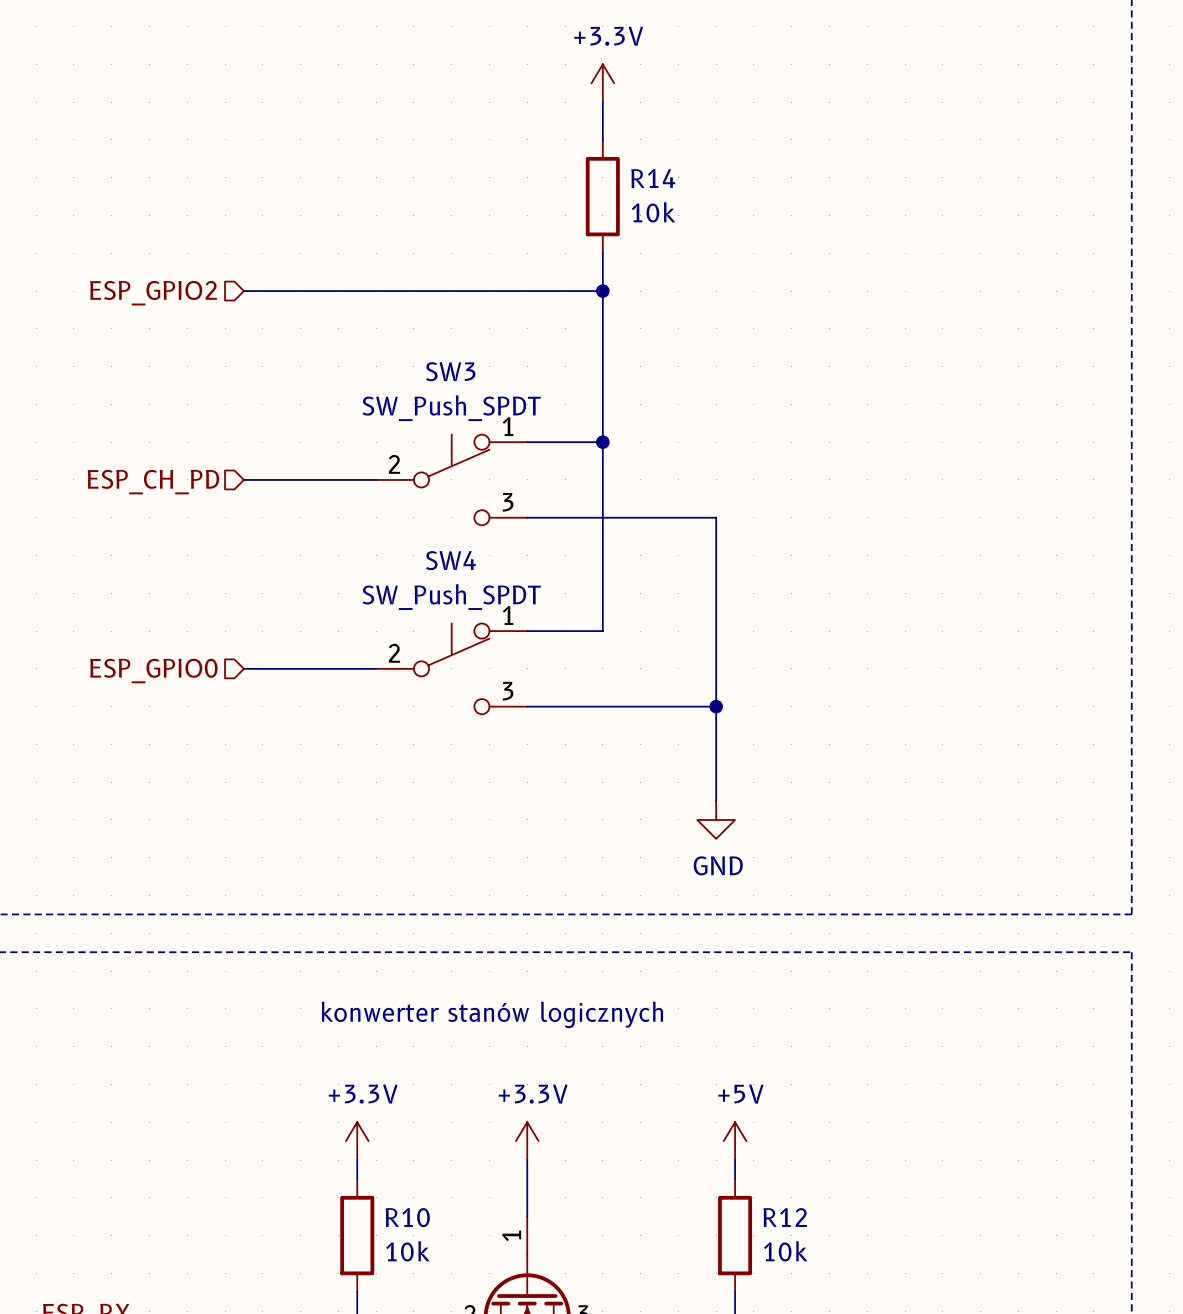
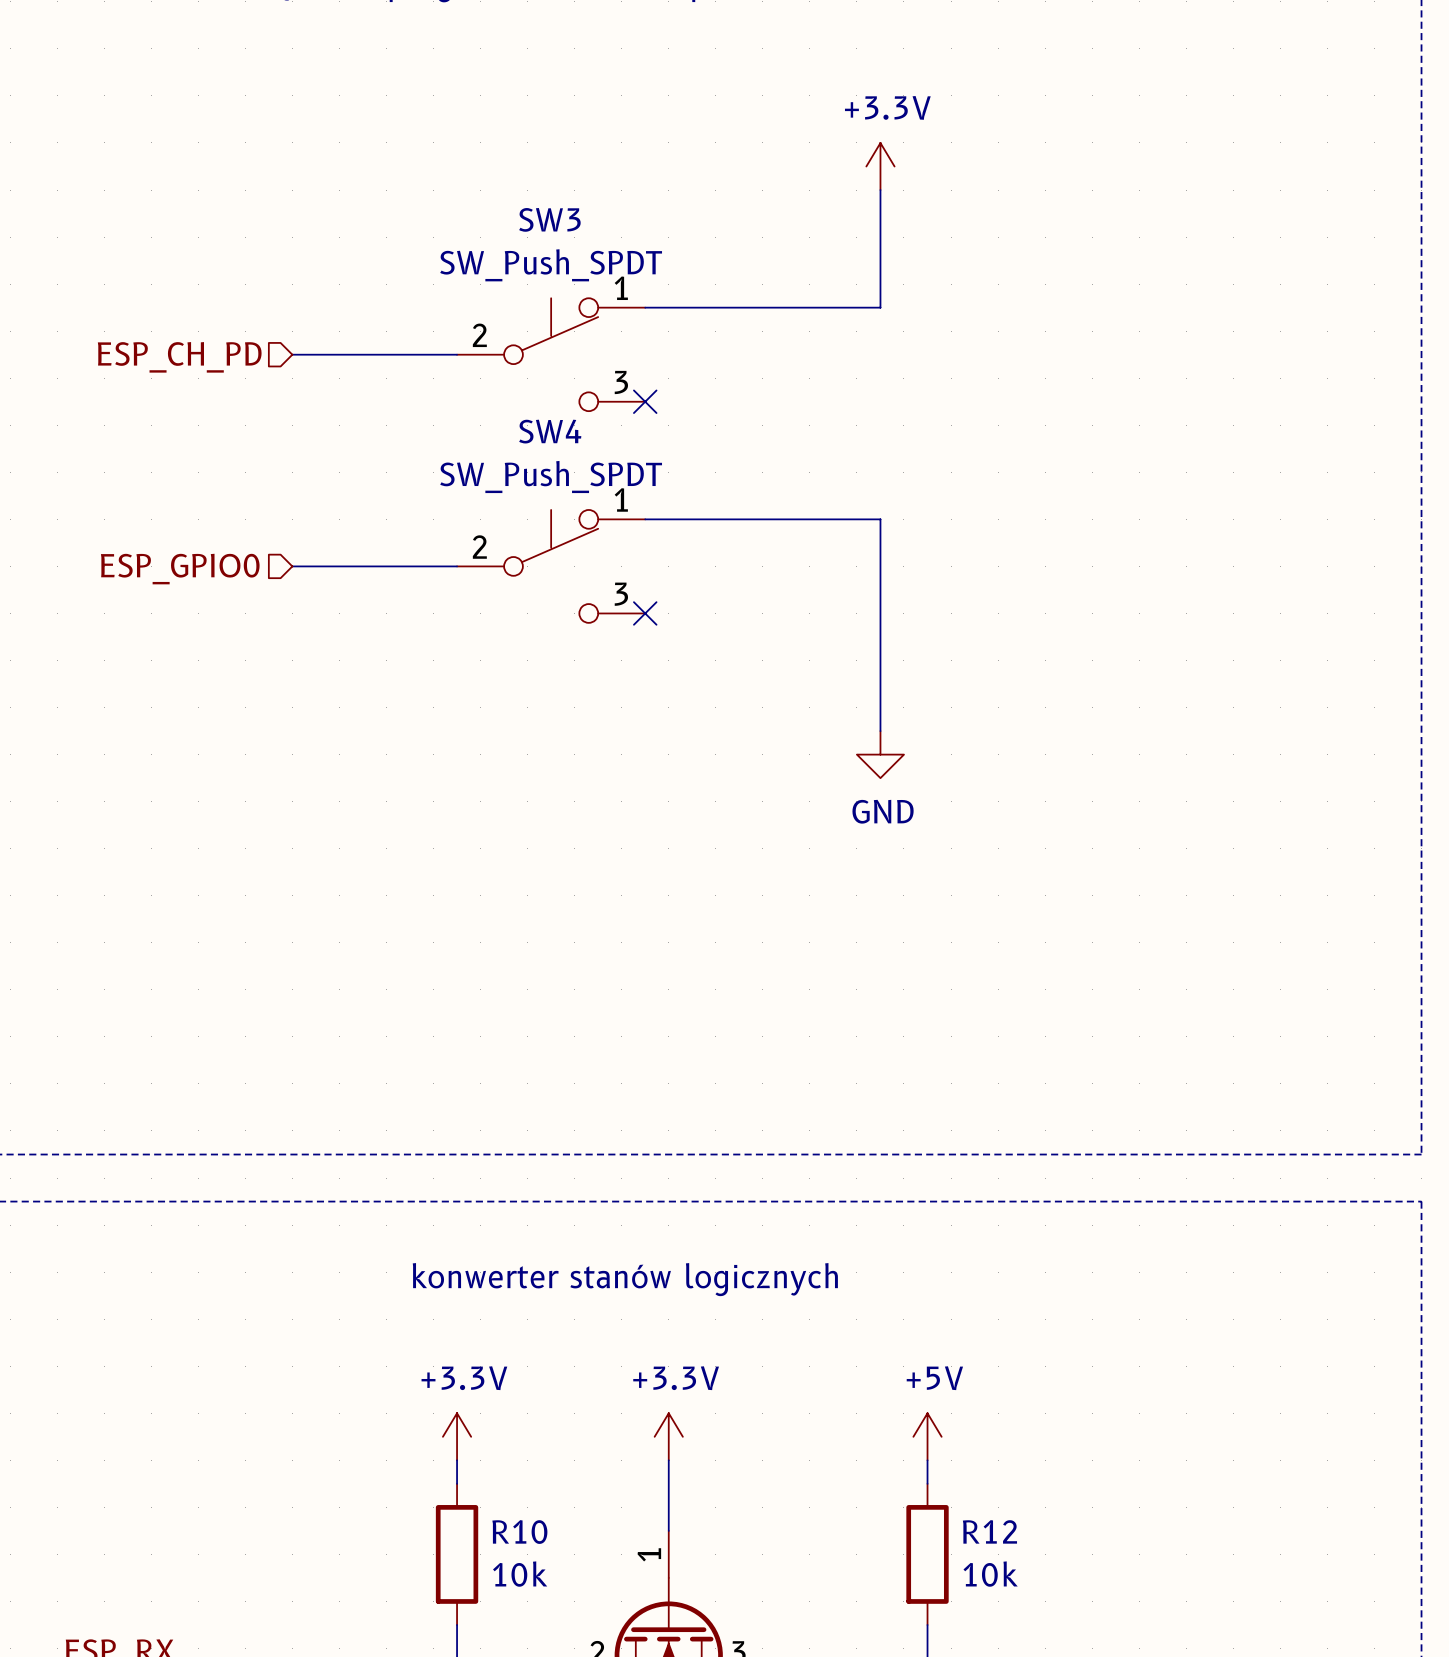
power symbol position: +3.3V (602, 83) -> +3.3V (880, 166)
wire: (602, 102) (602, 139) -> none
wire: none -> (880, 190) (880, 307) (645, 307)
R14: 10k (602, 196) -> none
wire: (602, 253) (602, 631) (527, 631) -> none
wire: none -> (292, 354) (457, 354)
wire: (243, 291) (602, 291) -> none
junction: (602, 291) -> none
hierarchical label: ESP_GPIO2 (153, 293) -> none
no-connect mark: none -> (645, 401)
wire: none -> (645, 519) (880, 519) (880, 731)
wire: (527, 442) (602, 442) -> none
junction: (602, 442) -> none
wire: (243, 479) (376, 479) -> (292, 566) (457, 566)
SW3 position: (451, 479) -> (551, 354)
no-connect mark: none -> (645, 613)
hierarchical label position: ESP_CH_PD (153, 482) -> ESP_CH_PD (179, 357)
wire: (527, 517) (716, 517) (716, 801) -> none
wire: (243, 668) (376, 668) -> none
SW4 position: (451, 668) -> (551, 566)
hierarchical label position: ESP_GPIO0 (153, 670) -> ESP_GPIO0 (180, 569)
wire: (527, 706) (716, 706) -> none
junction: (716, 706) -> none
power symbol position: GND (716, 819) -> GND (880, 754)

